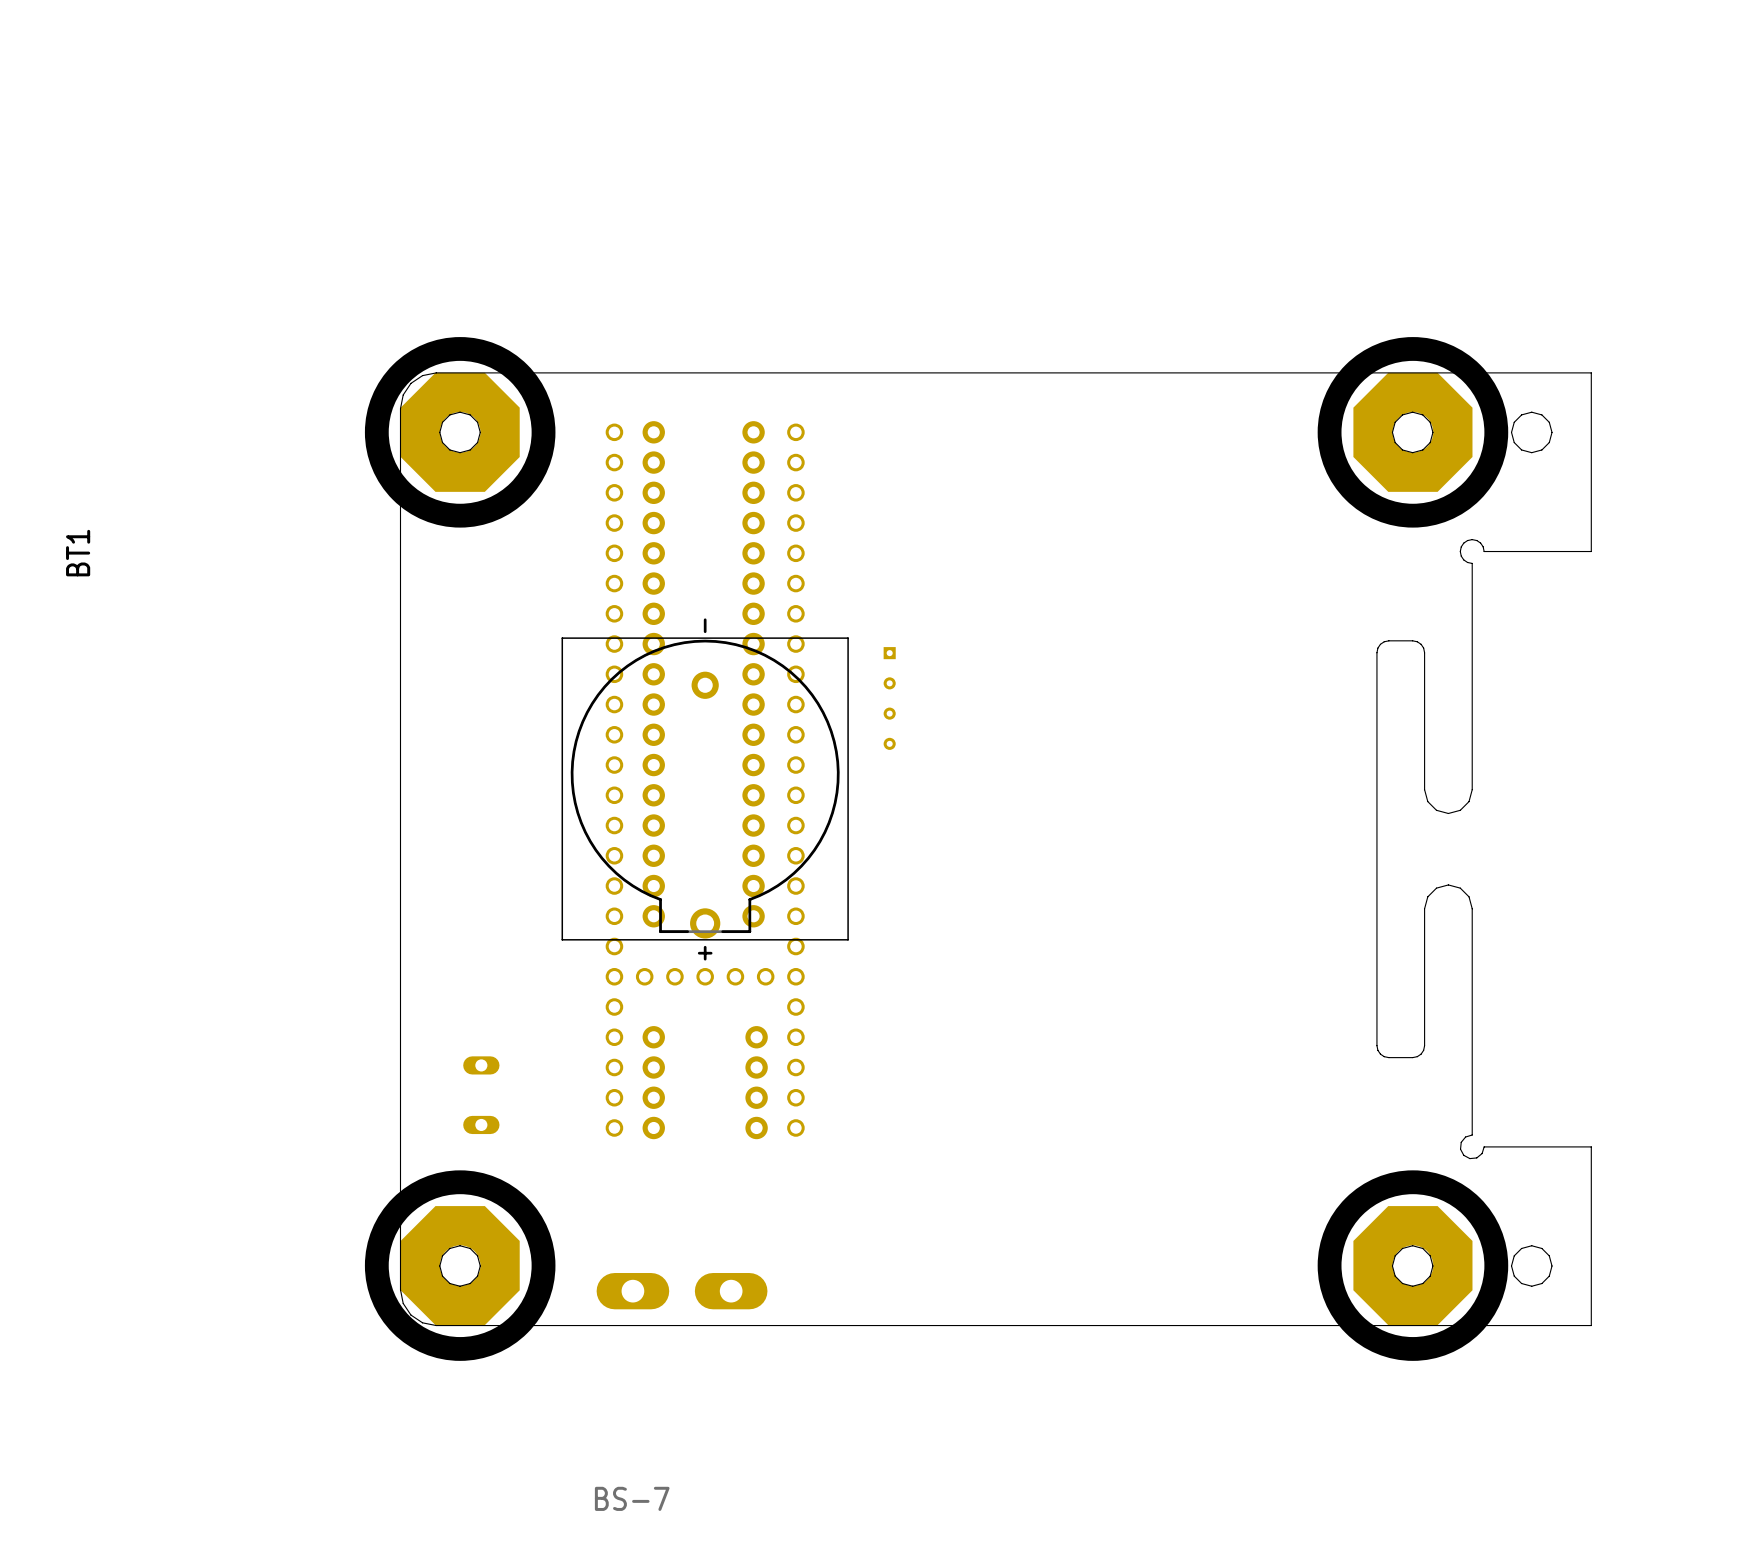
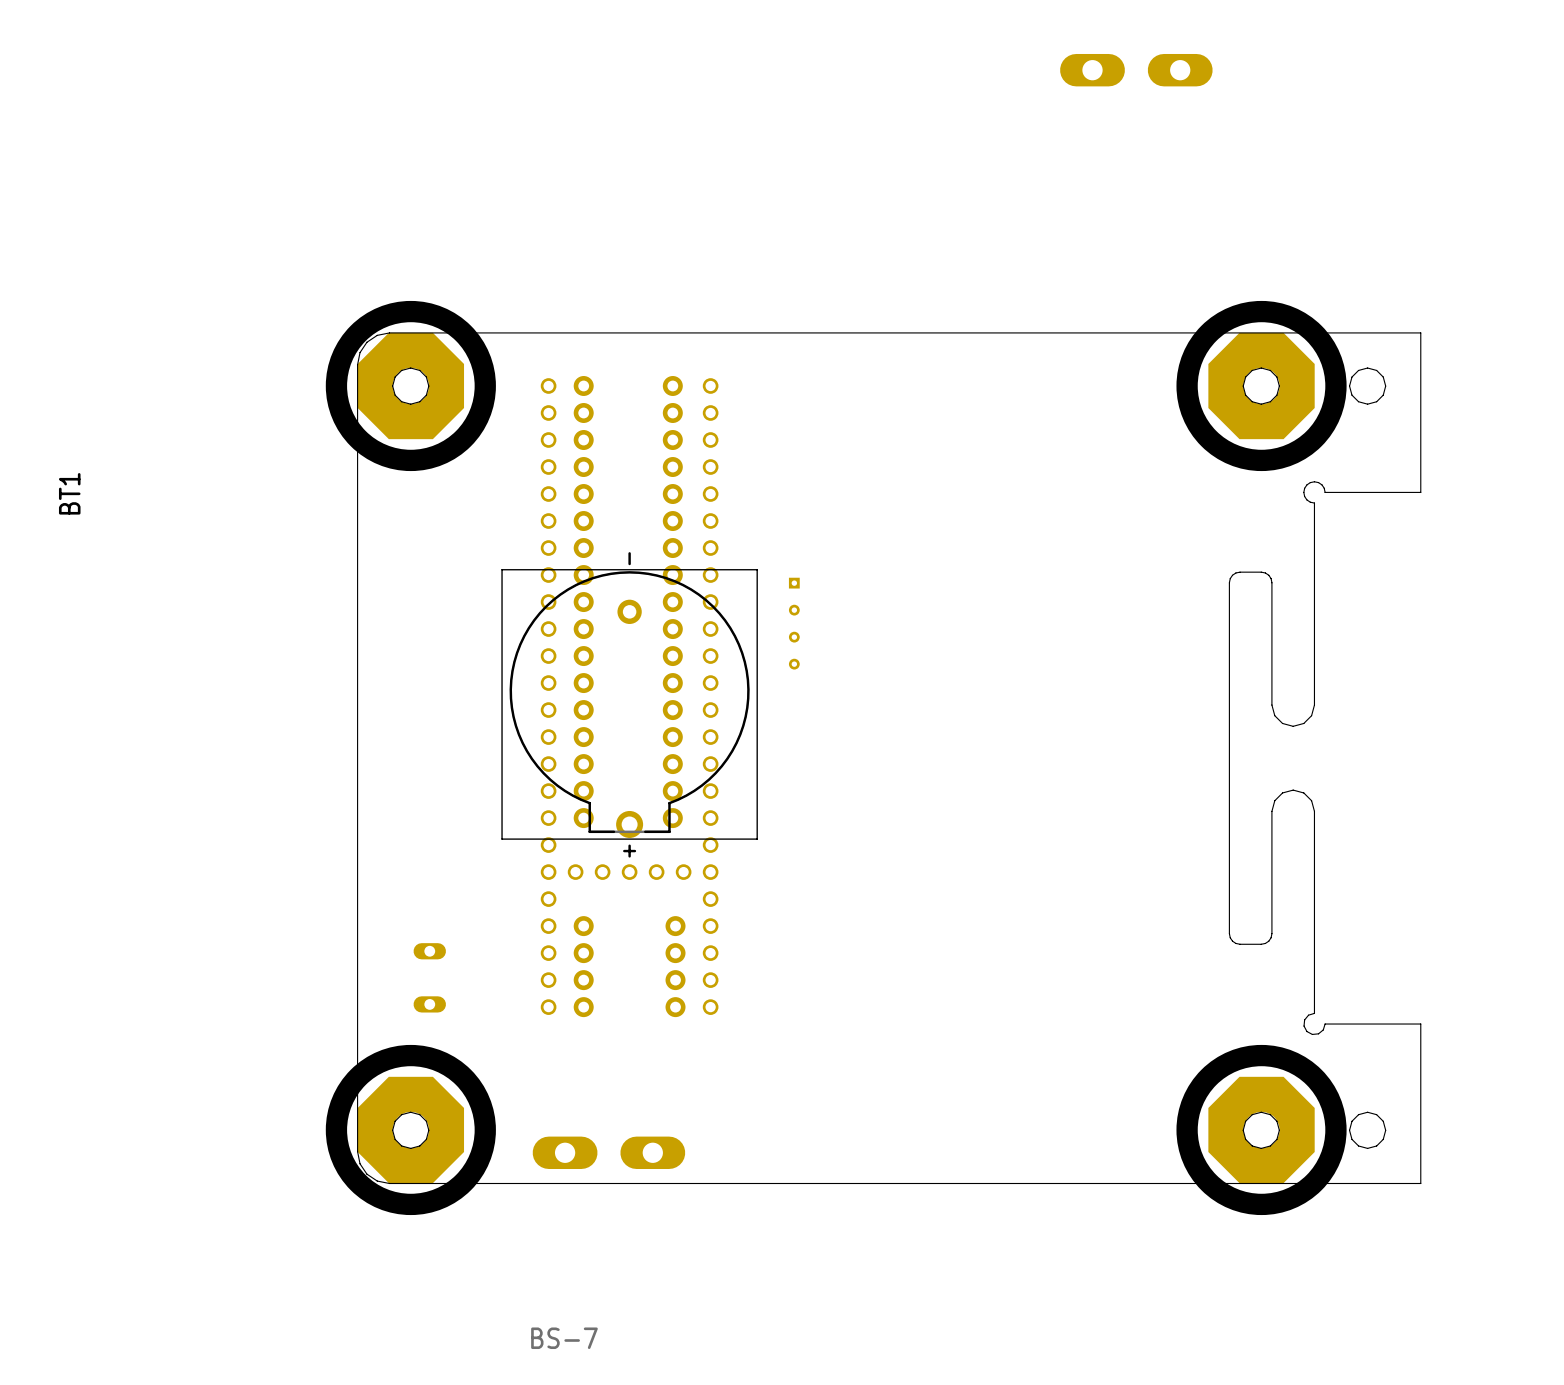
part: none -> (1136, 70)

